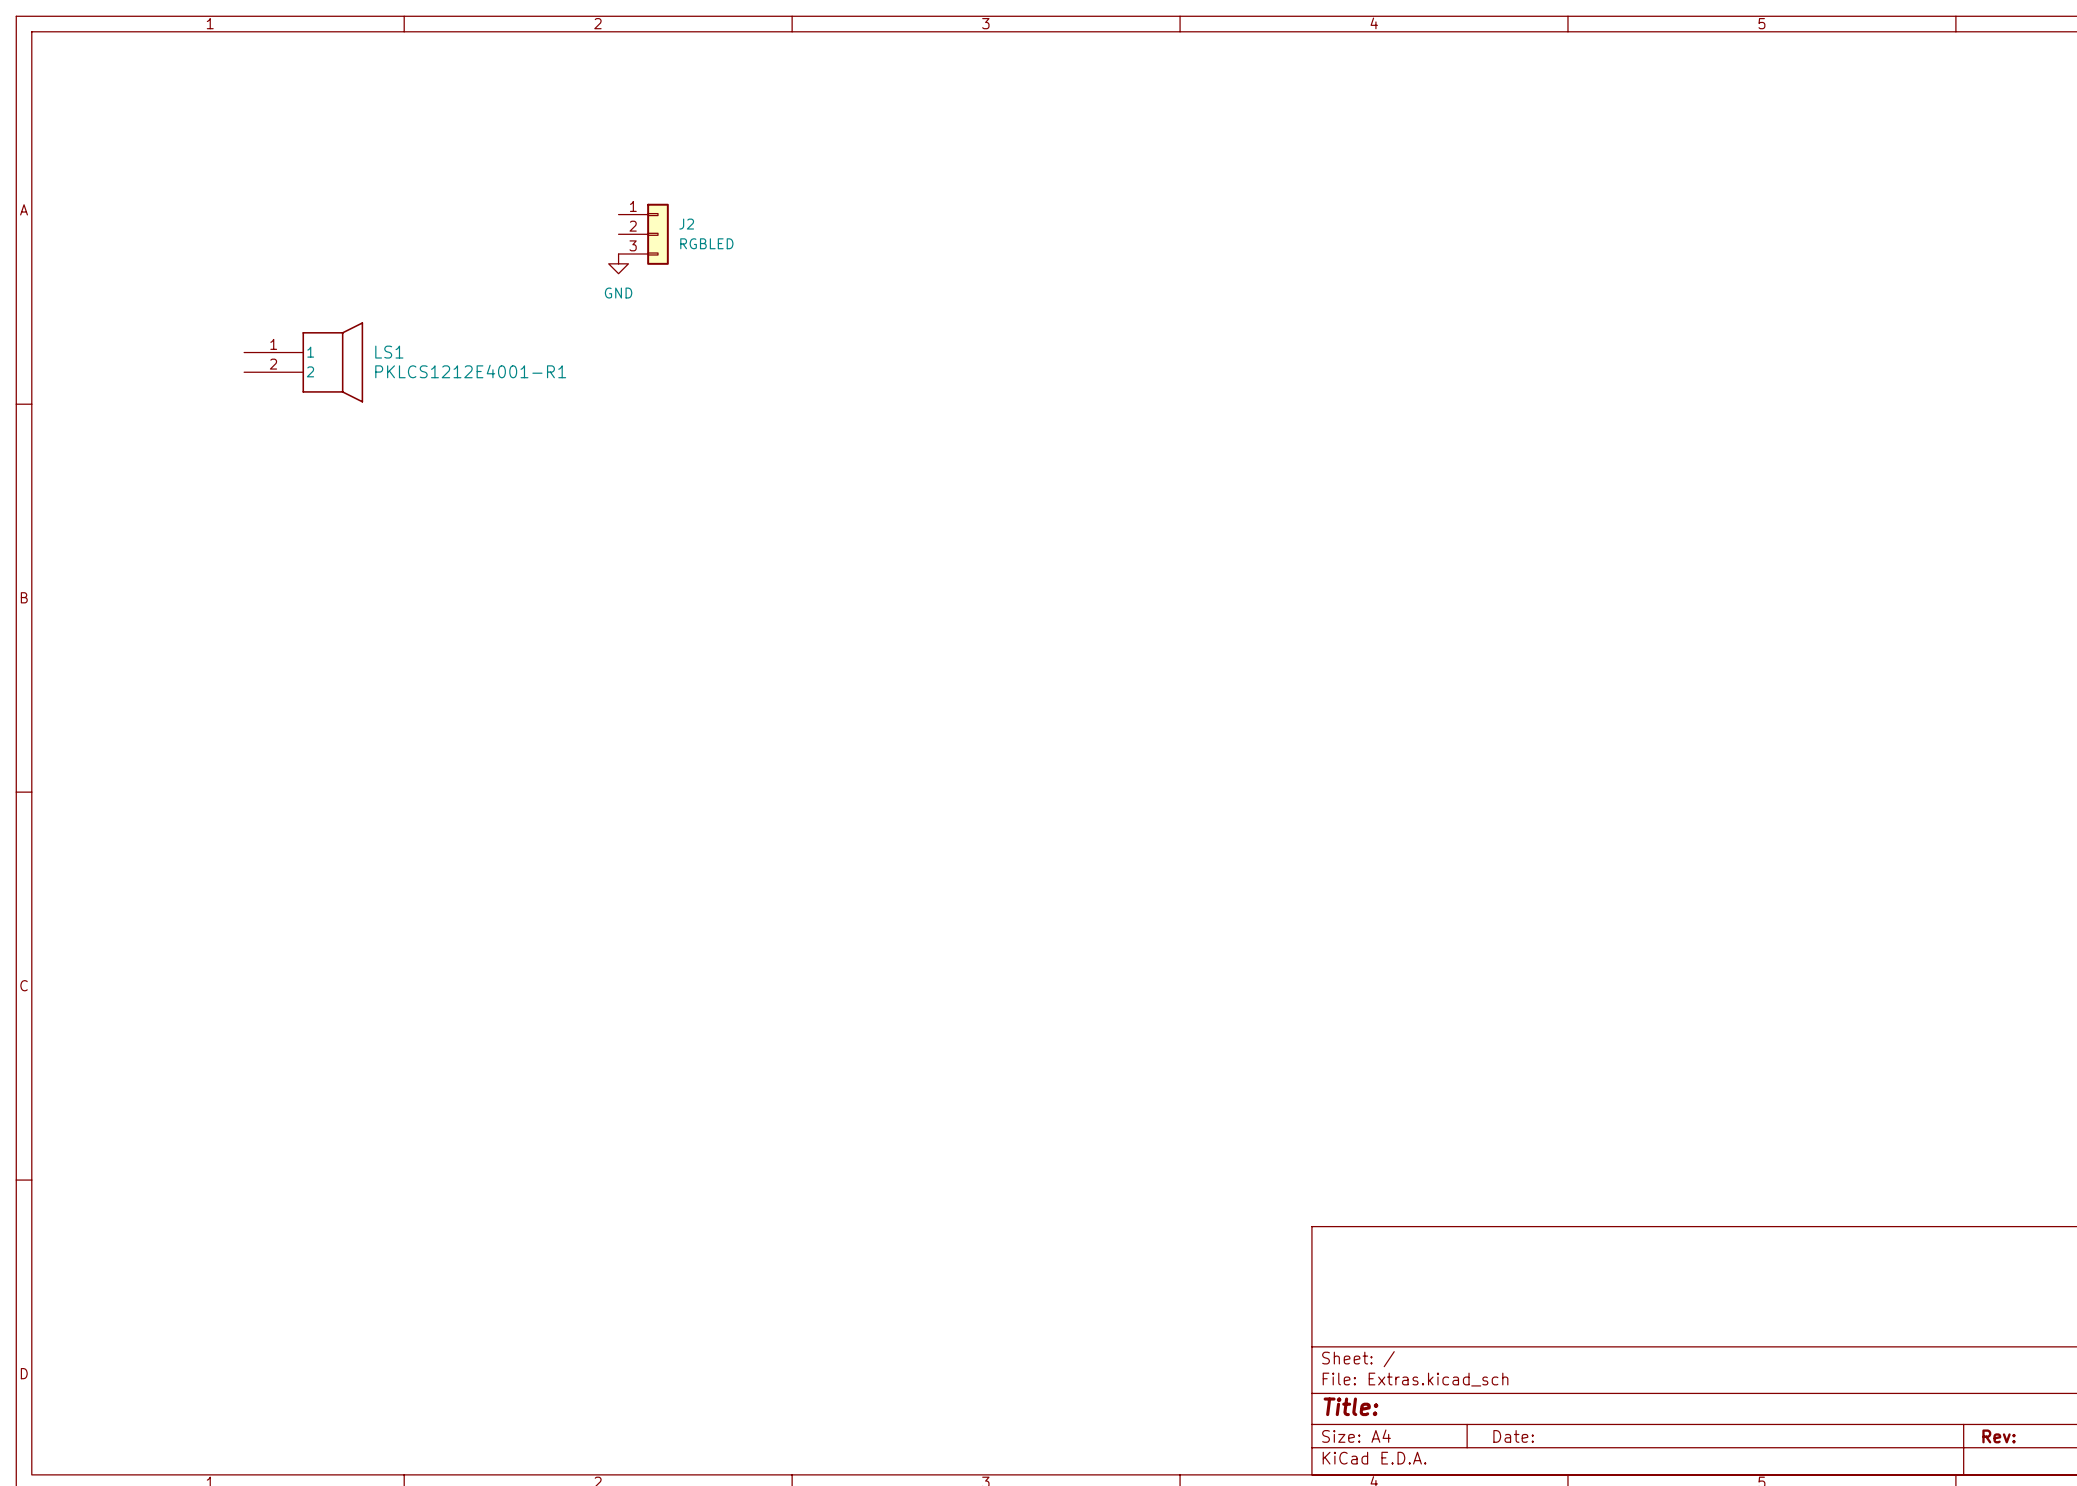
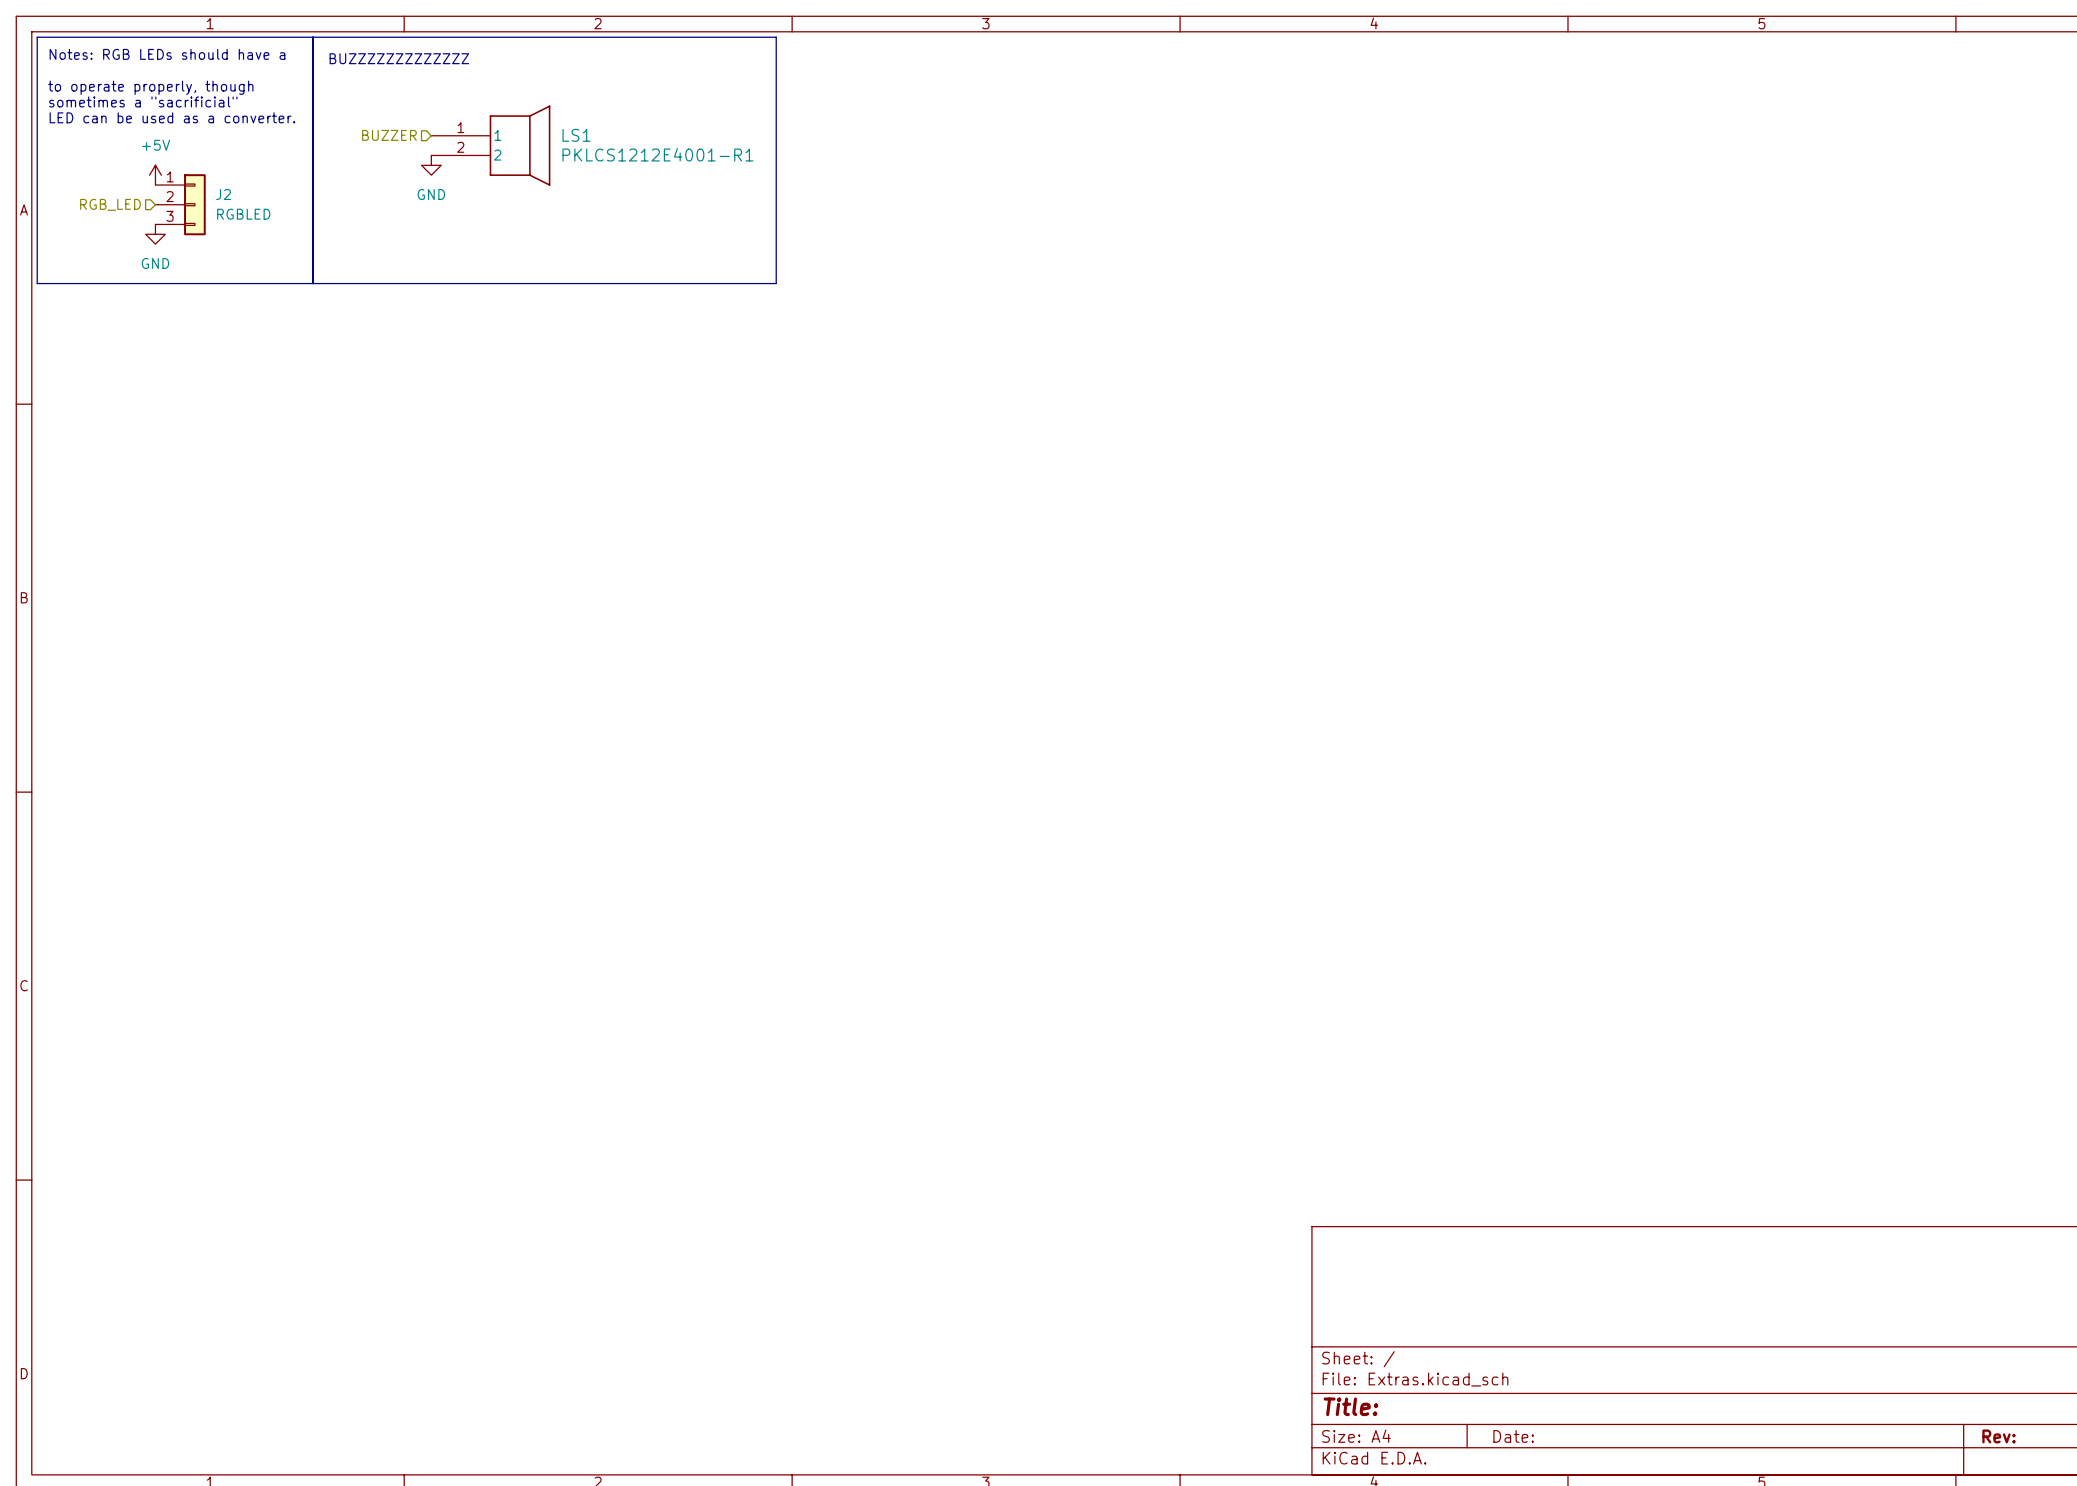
line: none -> (37, 37) (776, 37) (776, 283) (37, 283) (37, 37)
line: none -> (313, 37) (313, 283)
text: none -> Notes: RGB LEDs should have a (167, 54)
text: none -> BUZZZZZZZZZZZZZ (399, 58)
text: none -> to operate properly, though (150, 87)
text: none -> sometimes a "sacrificial" (143, 101)
text: none -> LED can be used as a converter. (172, 117)
hierarchical label: none -> BUZZER (389, 135)
power symbol: none -> GND (431, 165)
power symbol: none -> +5V (155, 175)
hierarchical label: none -> RGB_LED (110, 204)
power symbol: none -> GND (155, 234)
J2 position: (643, 234) -> (180, 204)
power symbol: GND (618, 263) -> none
LS1 position: (303, 362) -> (490, 145)

